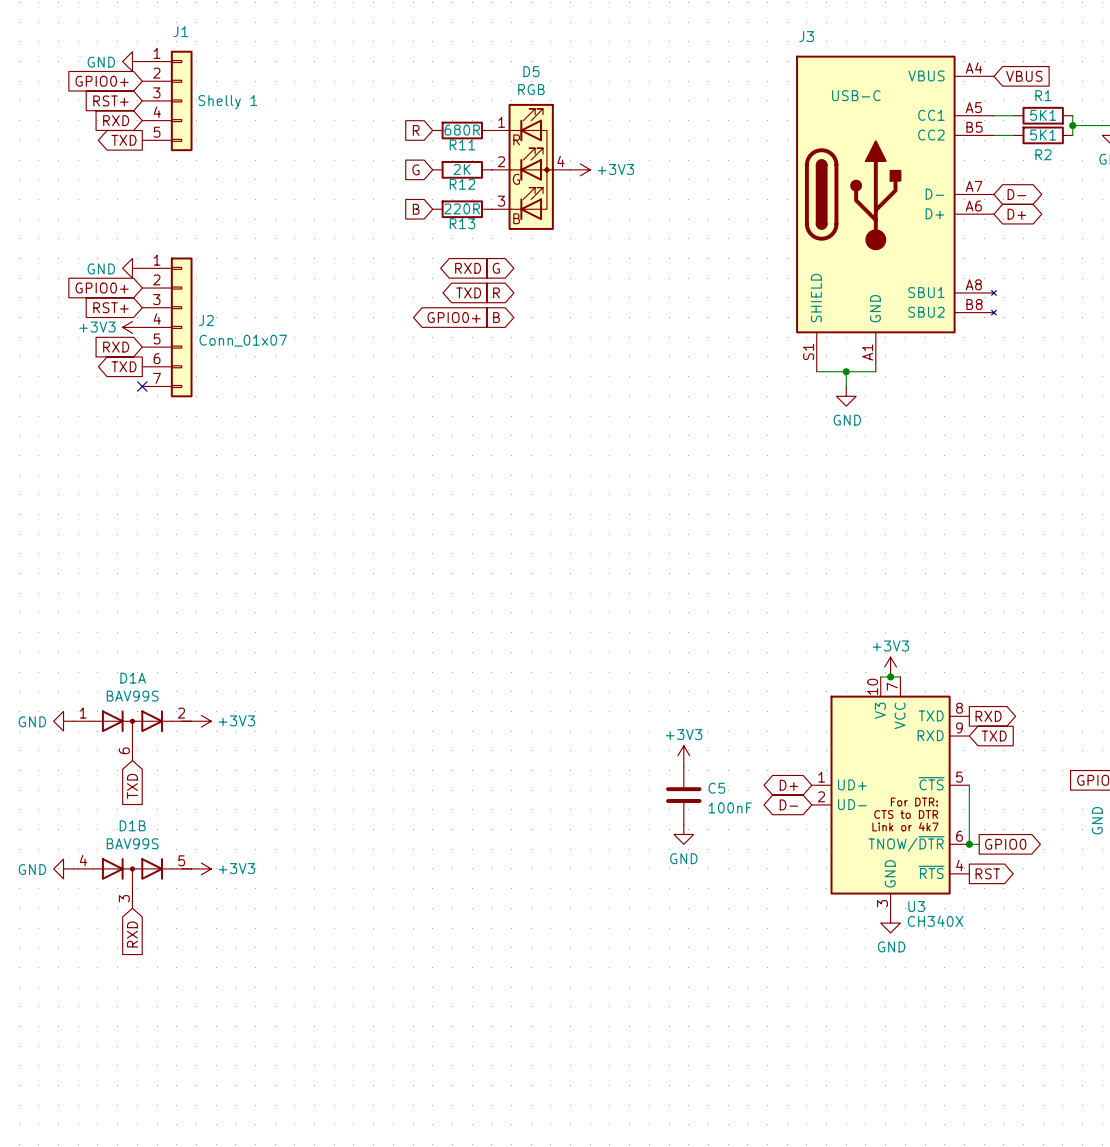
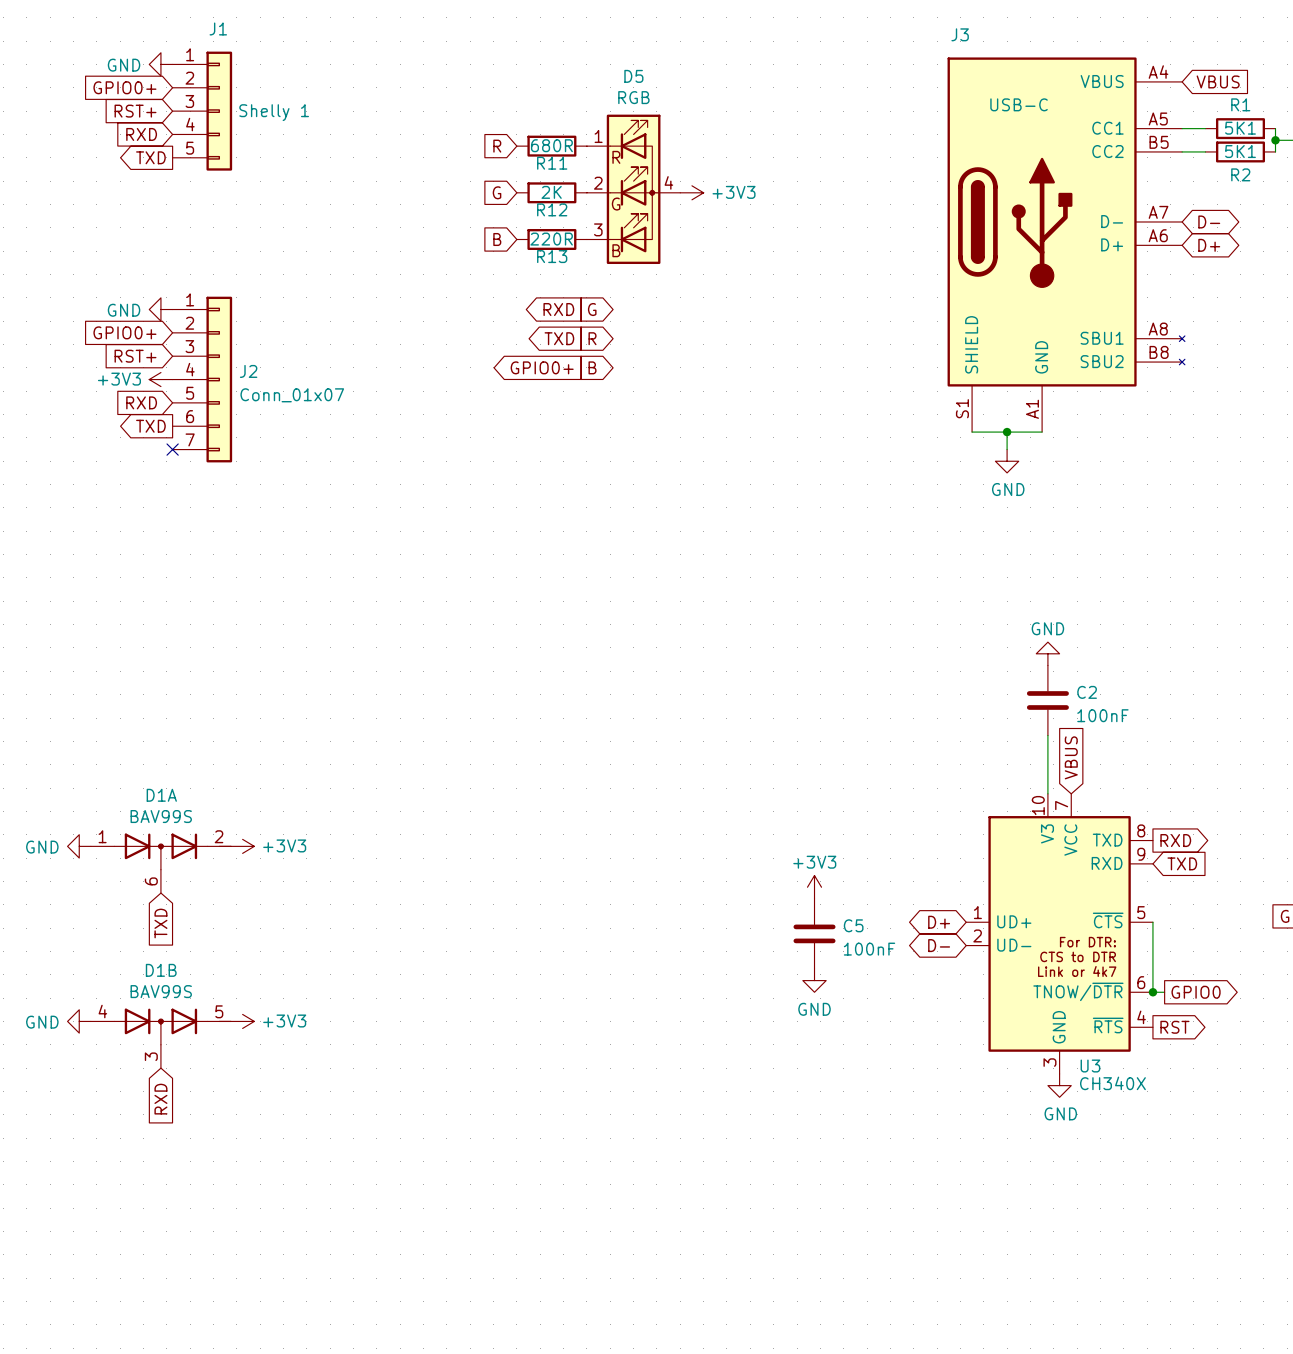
power symbol: none -> GND (1047, 653)
C2: none -> 100nF (1047, 700)
global label: none -> VBUS (1071, 757)
power symbol: +3V3 (890, 667) -> none
wire: (880, 676) (900, 676) -> (1047, 793) (1047, 735)
junction: (890, 676) -> none

